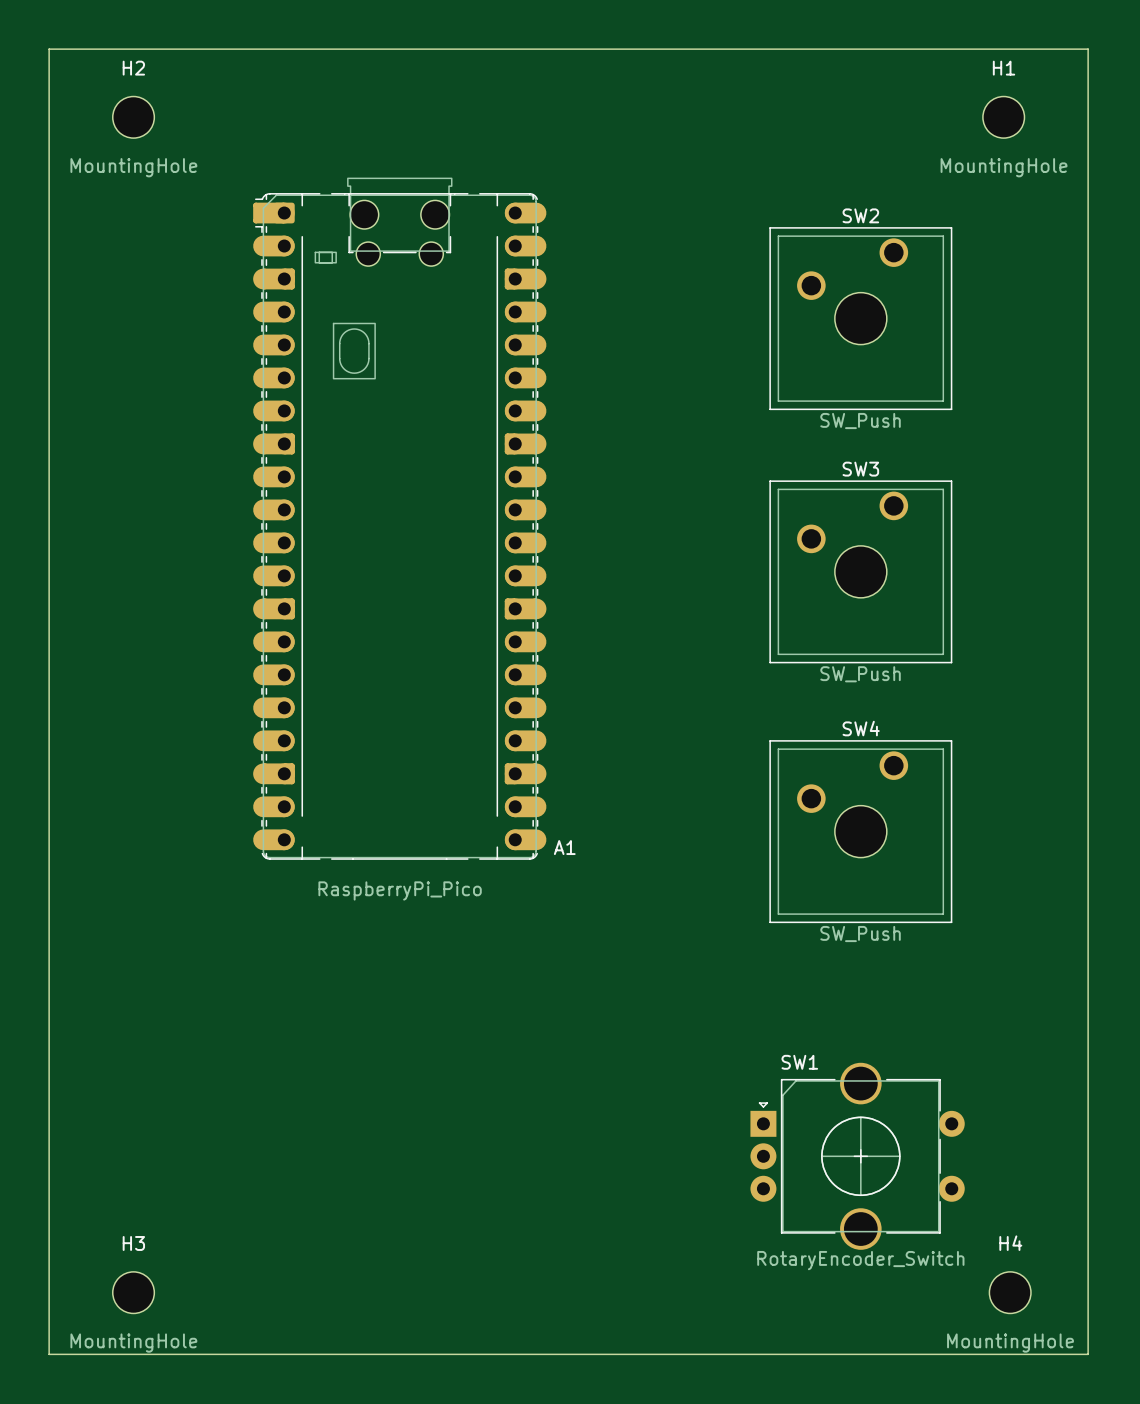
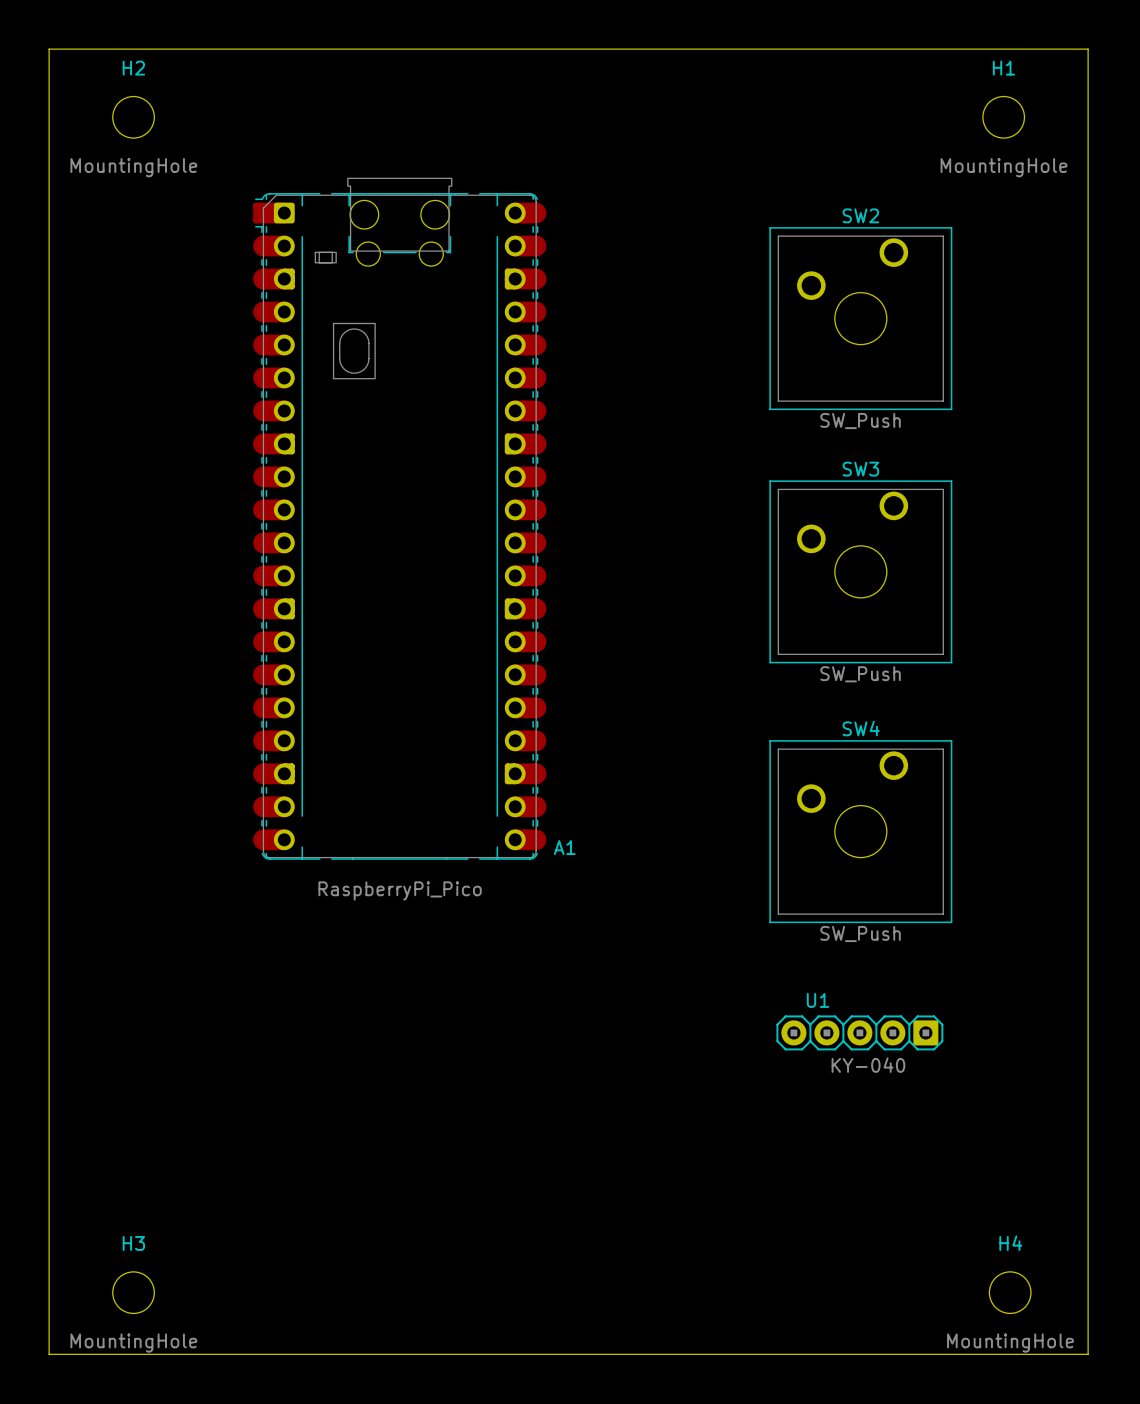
U1: none -> KY-040 (859, 1032)
SW1: RotaryEncoder_Switch (857, 1156) -> none

